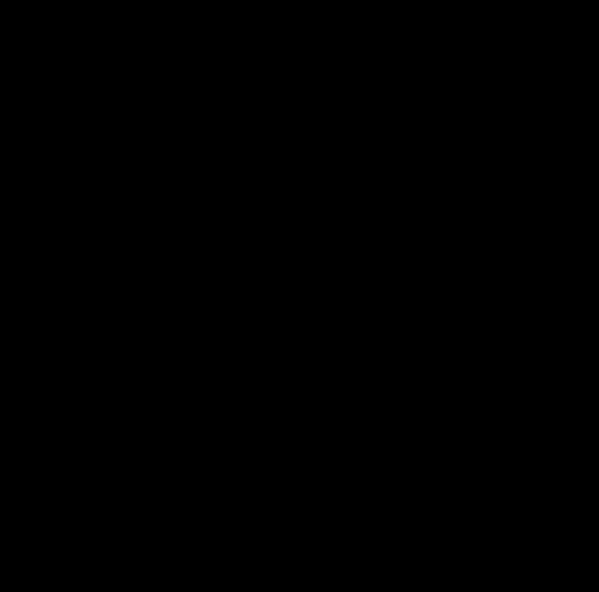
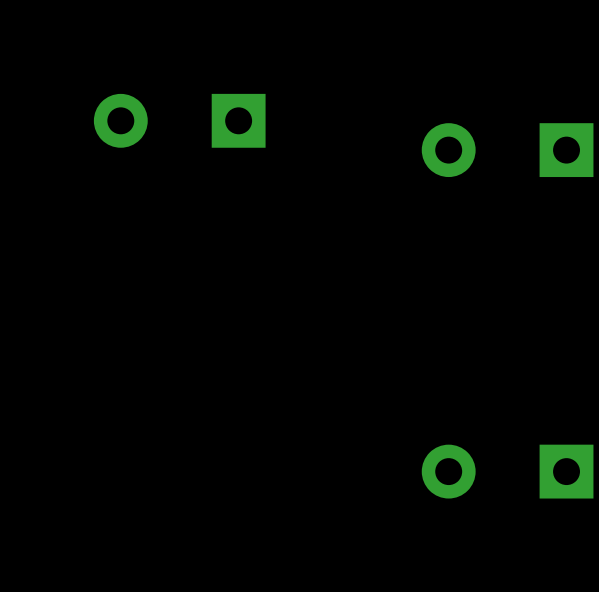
part: none -> (179, 120)
part: none -> (507, 150)
part: none -> (507, 471)

